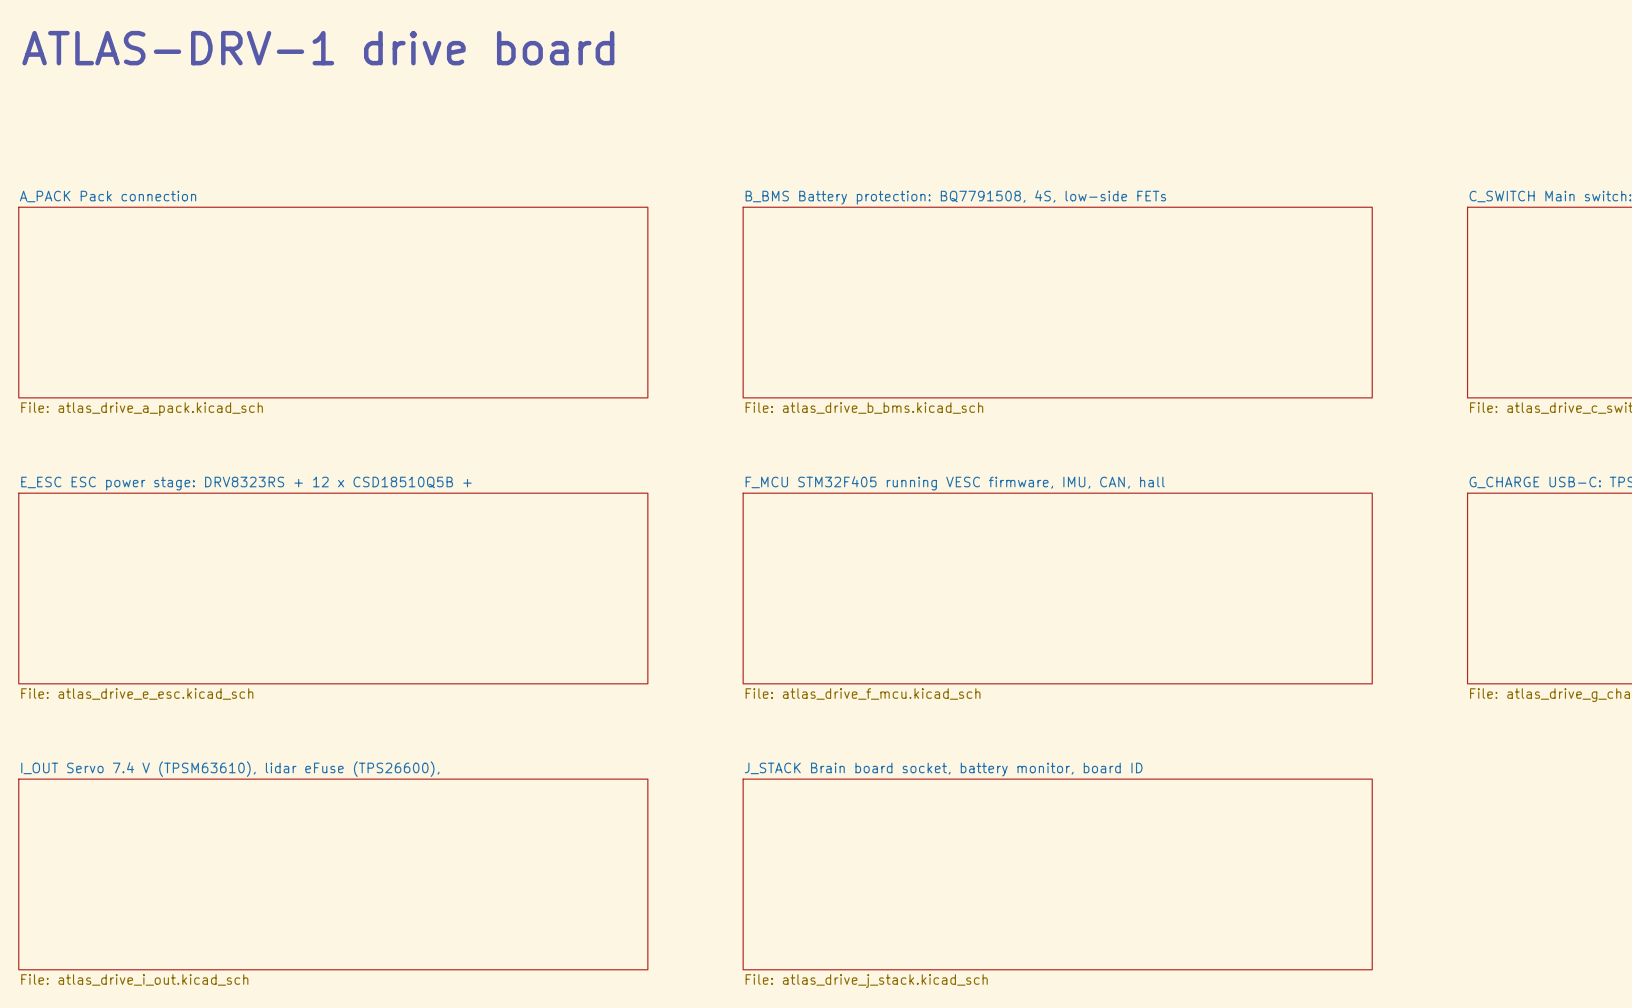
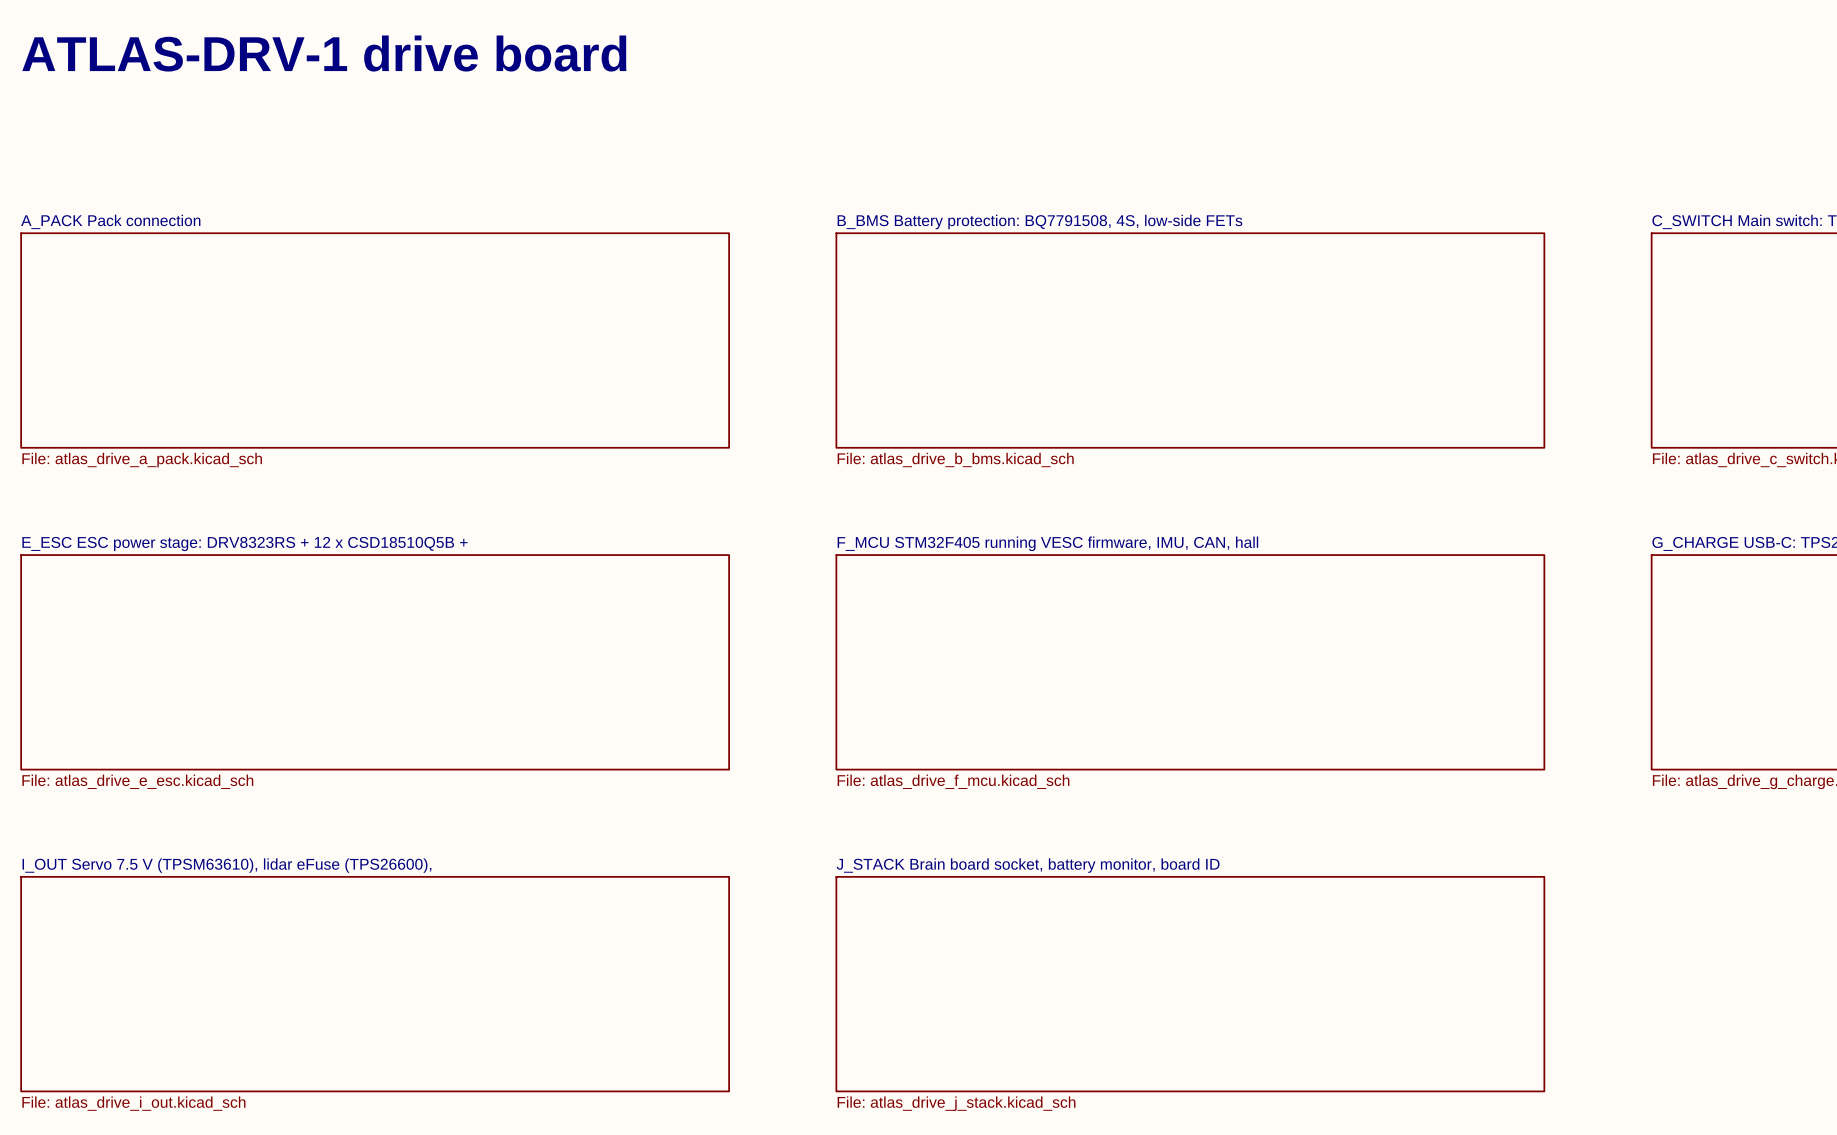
sheet I_OUT Servo 7.4 V (TPSM63610), lidar eFuse (TPS26600), name: I_OUT Servo 7.4 V (TPSM63610), lidar eFuse (TPS26600), (230, 769) -> I_OUT Servo 7.5 V (TPSM63610), lidar eFuse (TPS26600), (226, 865)

